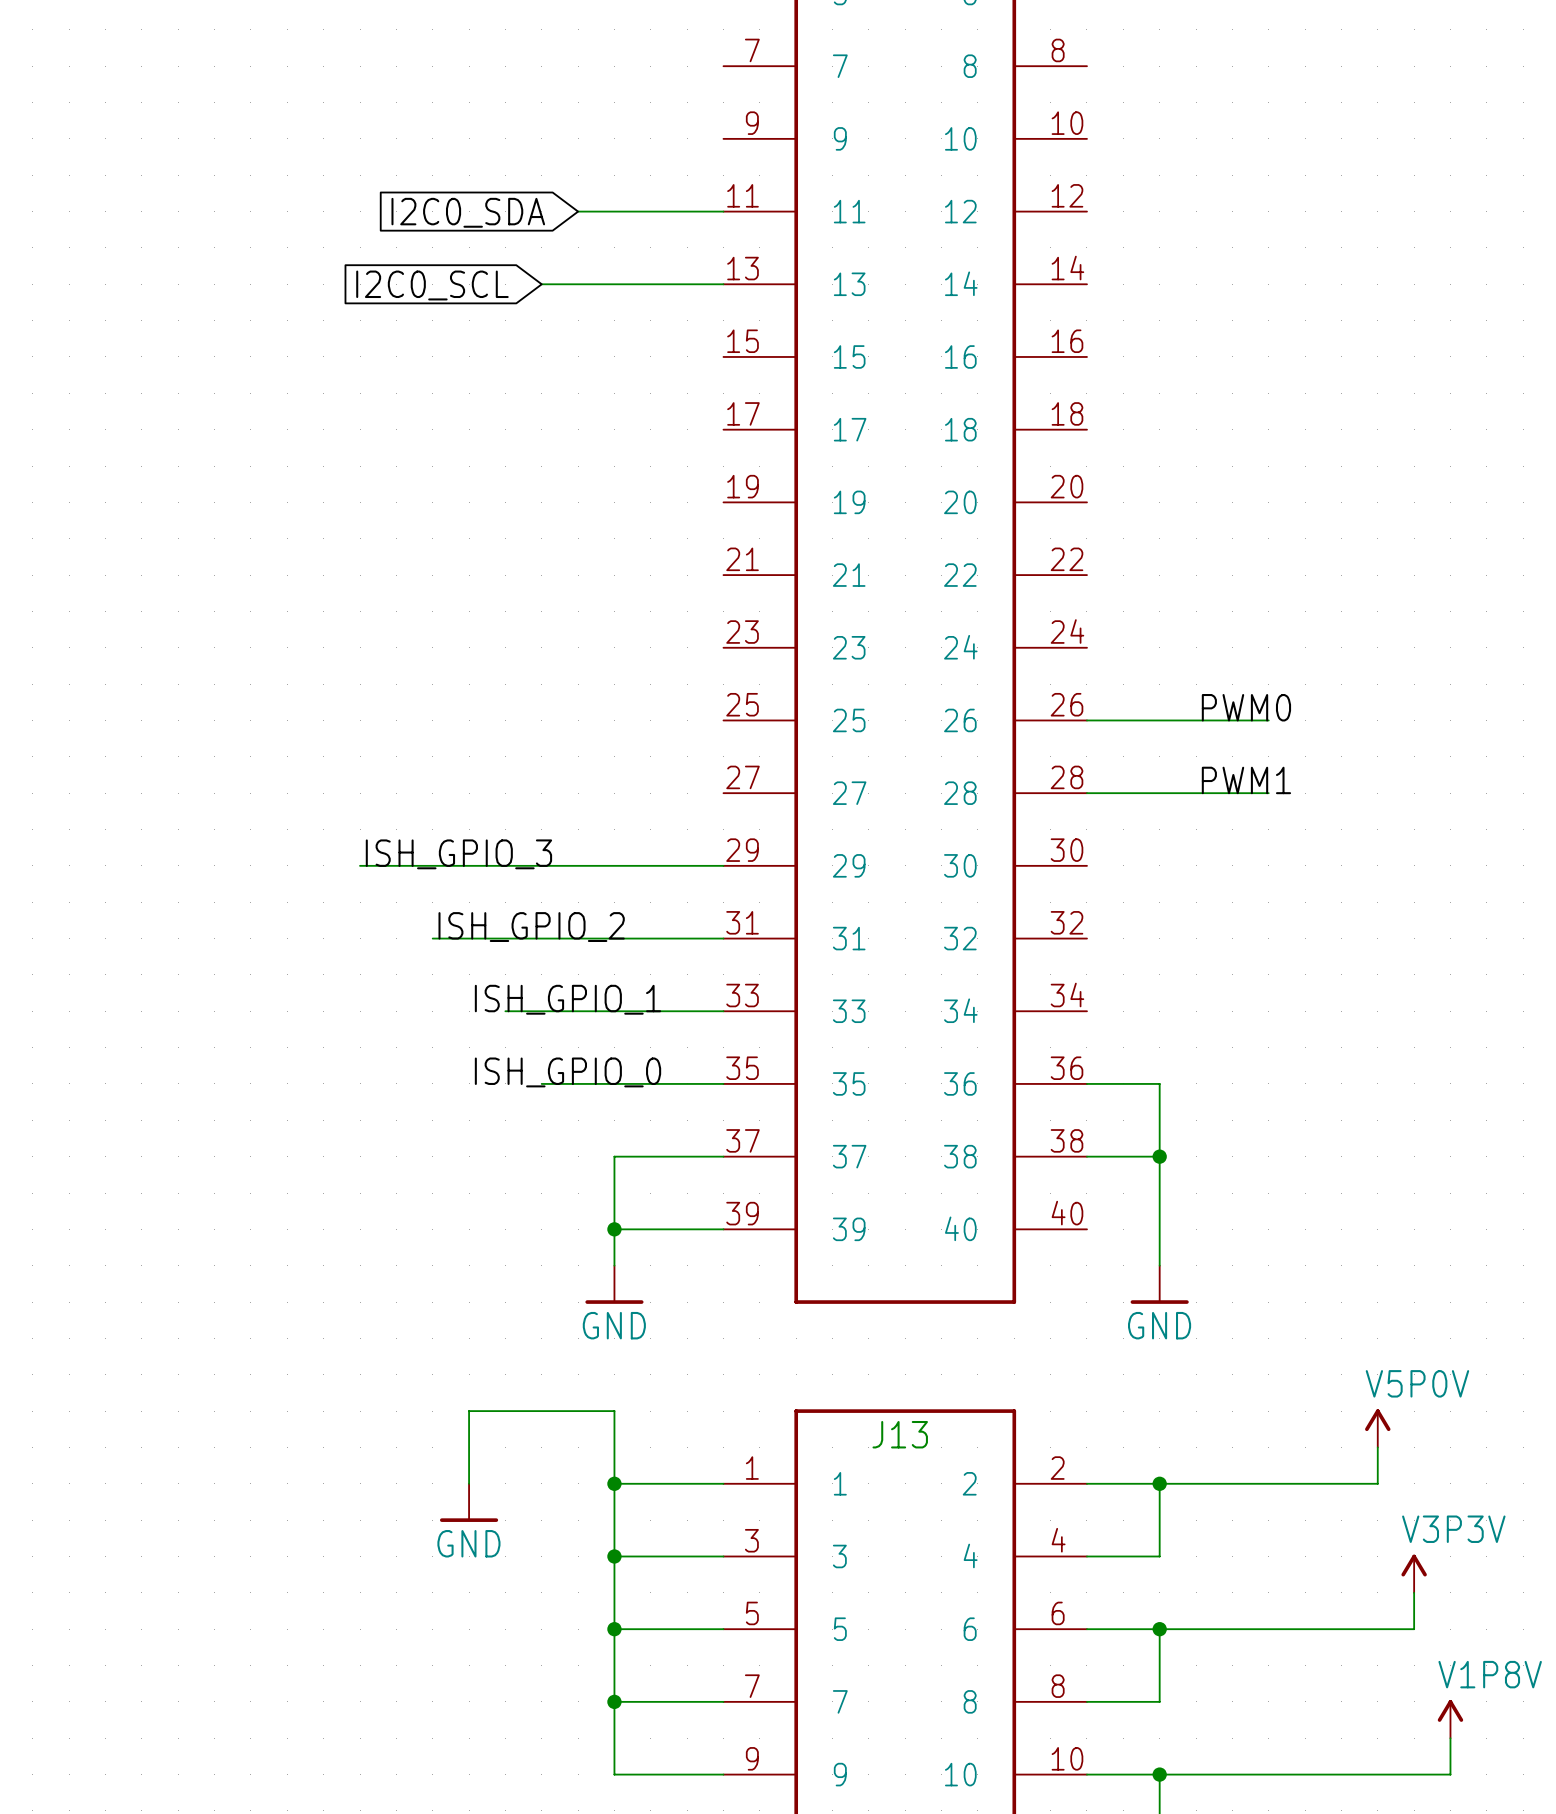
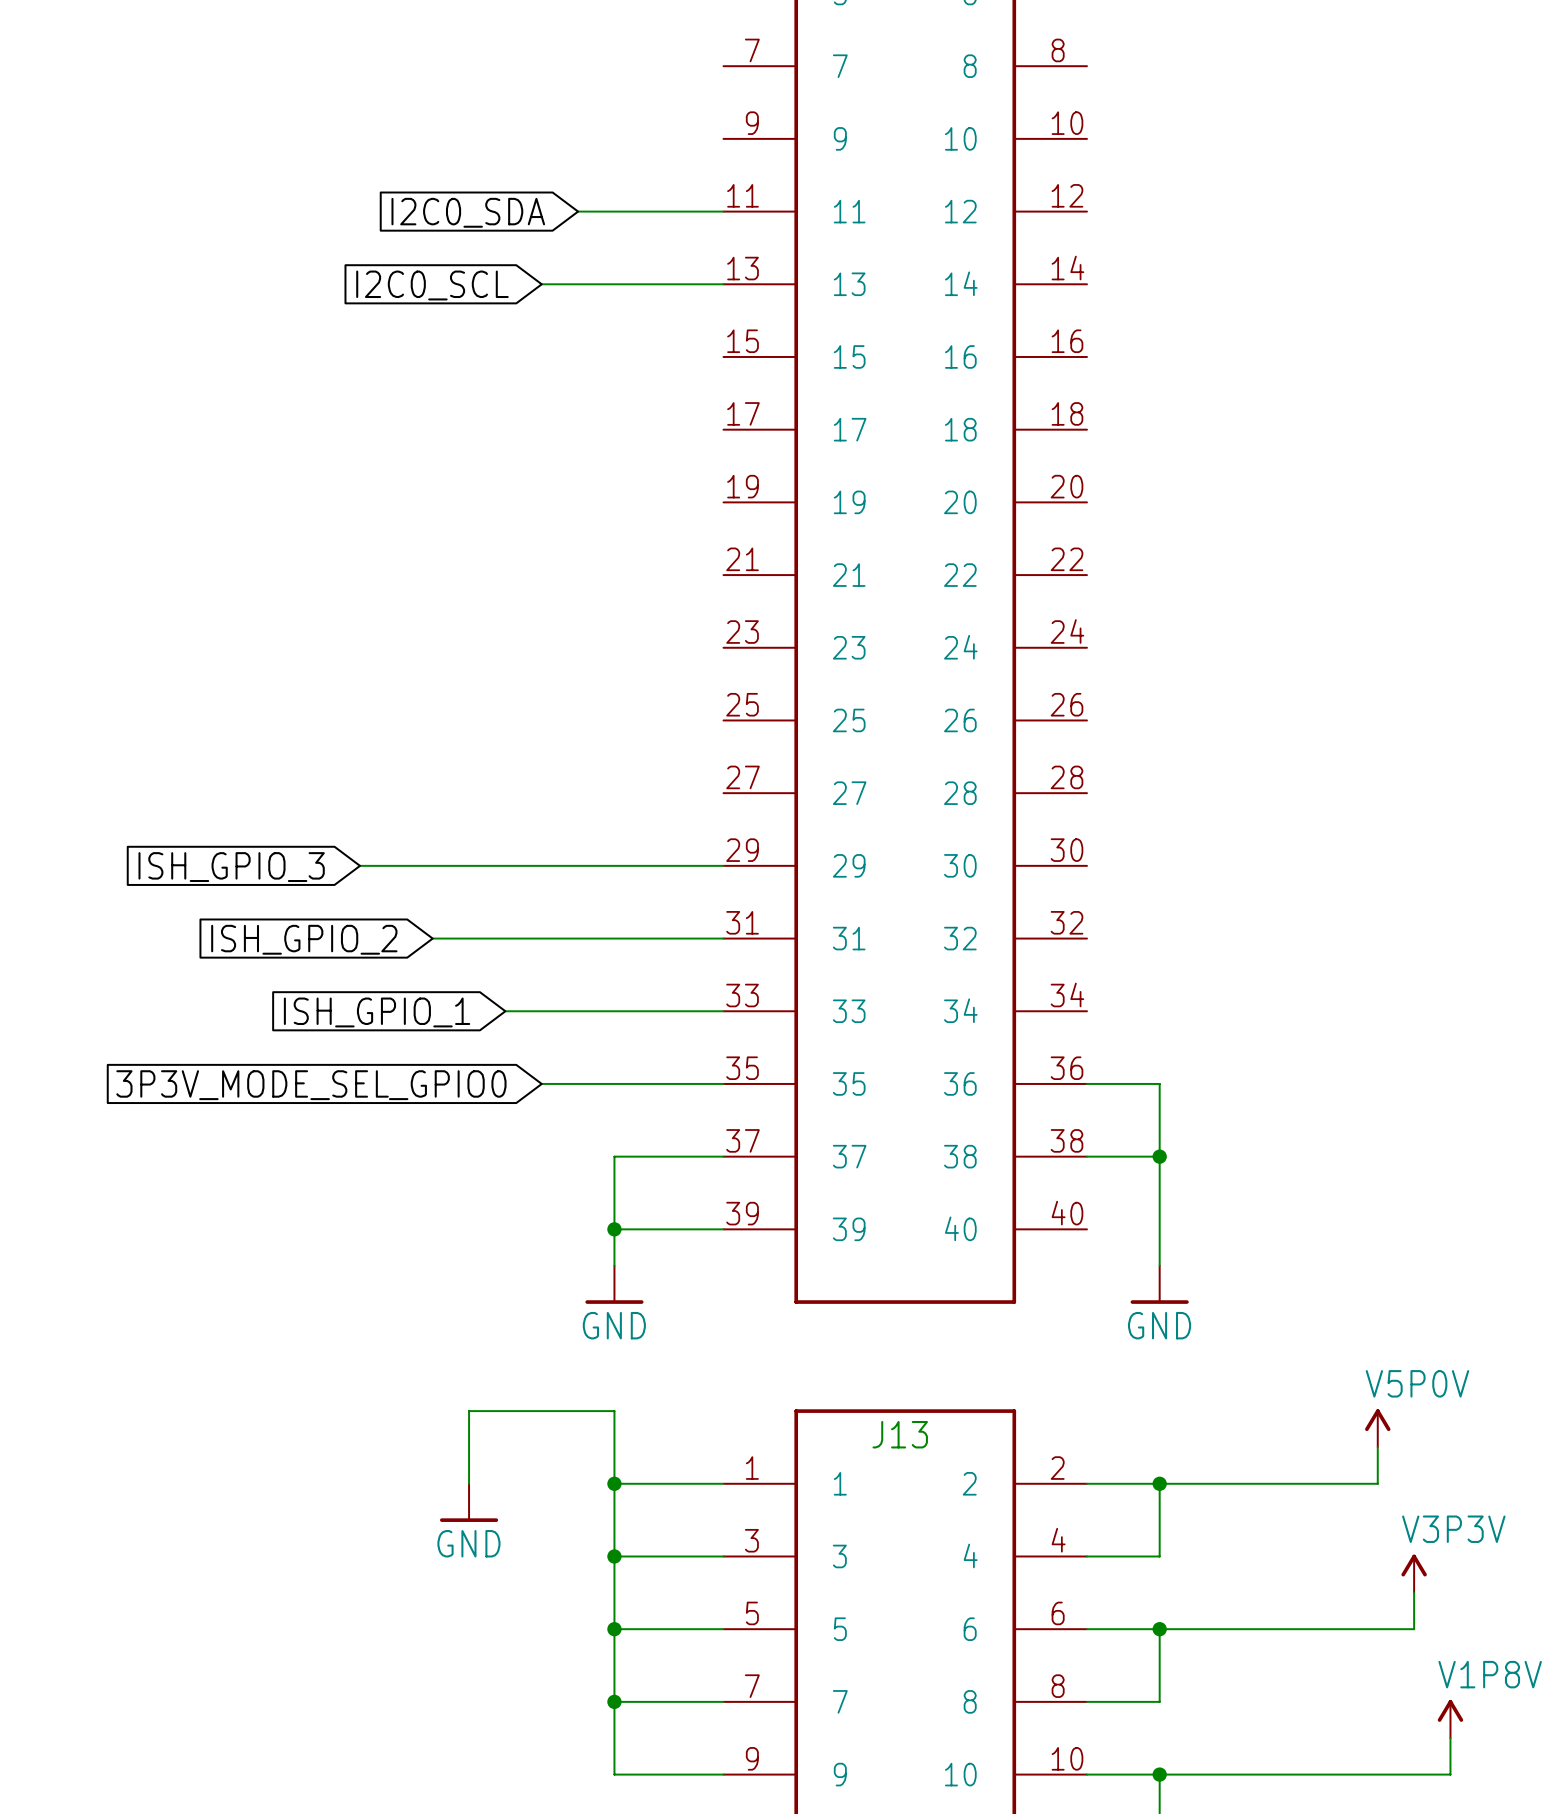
label: PWM0 (1246, 707) -> none
wire: (1086, 720) (1268, 720) -> none
label: PWM1 (1246, 780) -> none
wire: (1086, 793) (1268, 793) -> none
label: ISH_GPIO_3 (458, 854) -> none
global label: none -> ISH_GPIO_3 (231, 867)
label: ISH_GPIO_2 (531, 927) -> none
global label: none -> ISH_GPIO_2 (304, 939)
label: ISH_GPIO_1 (567, 999) -> none
global label: none -> ISH_GPIO_1 (377, 1012)
label: ISH_GPIO_0 (567, 1072) -> none
global label: none -> 3P3V_MODE_SEL_GPIO0 (311, 1085)

